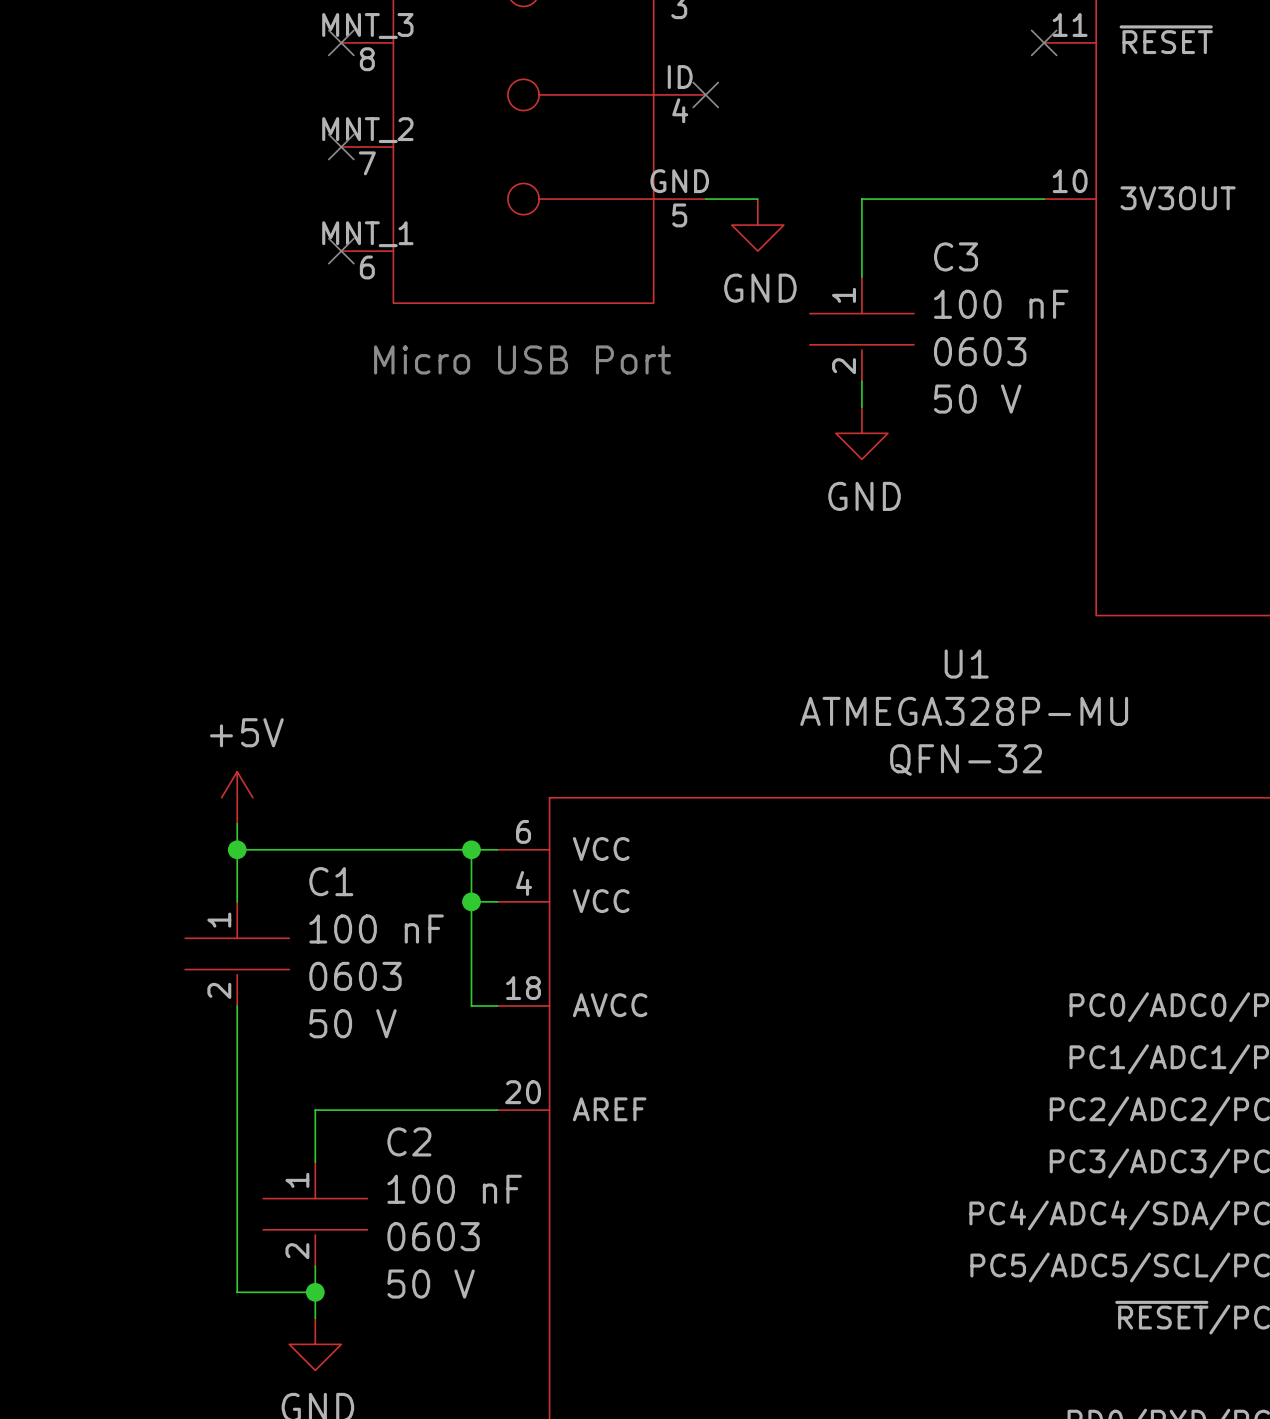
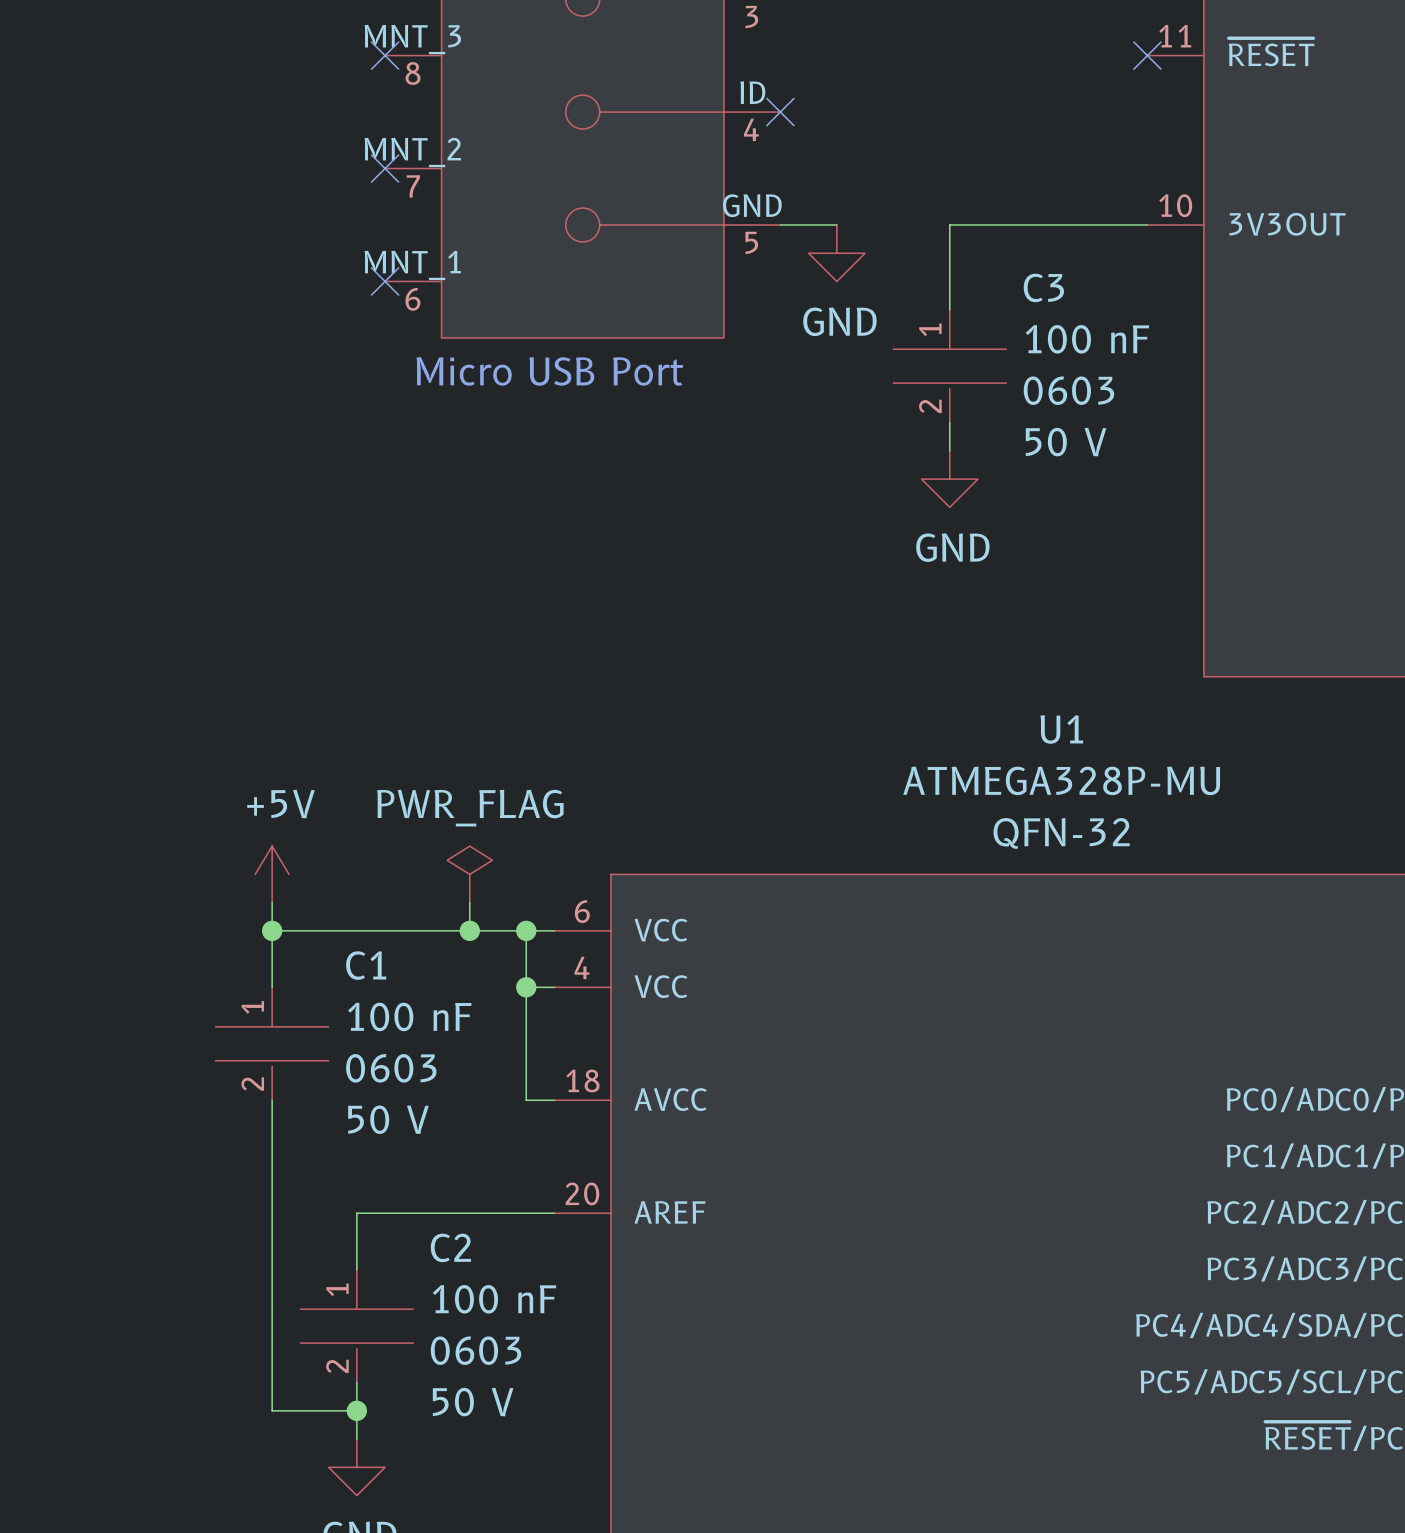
text position: Micro USB Port (522, 359) -> Micro USB Port (549, 371)
power symbol: none -> PWR_FLAG (469, 874)
wire: none -> (469, 902) (469, 930)
junction: none -> (469, 930)

